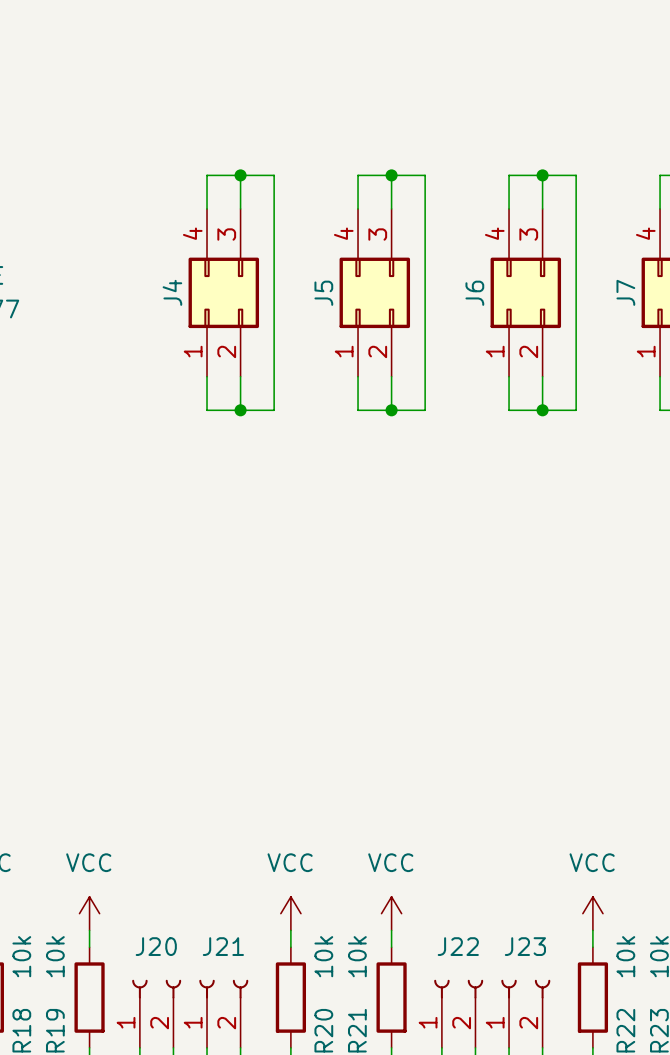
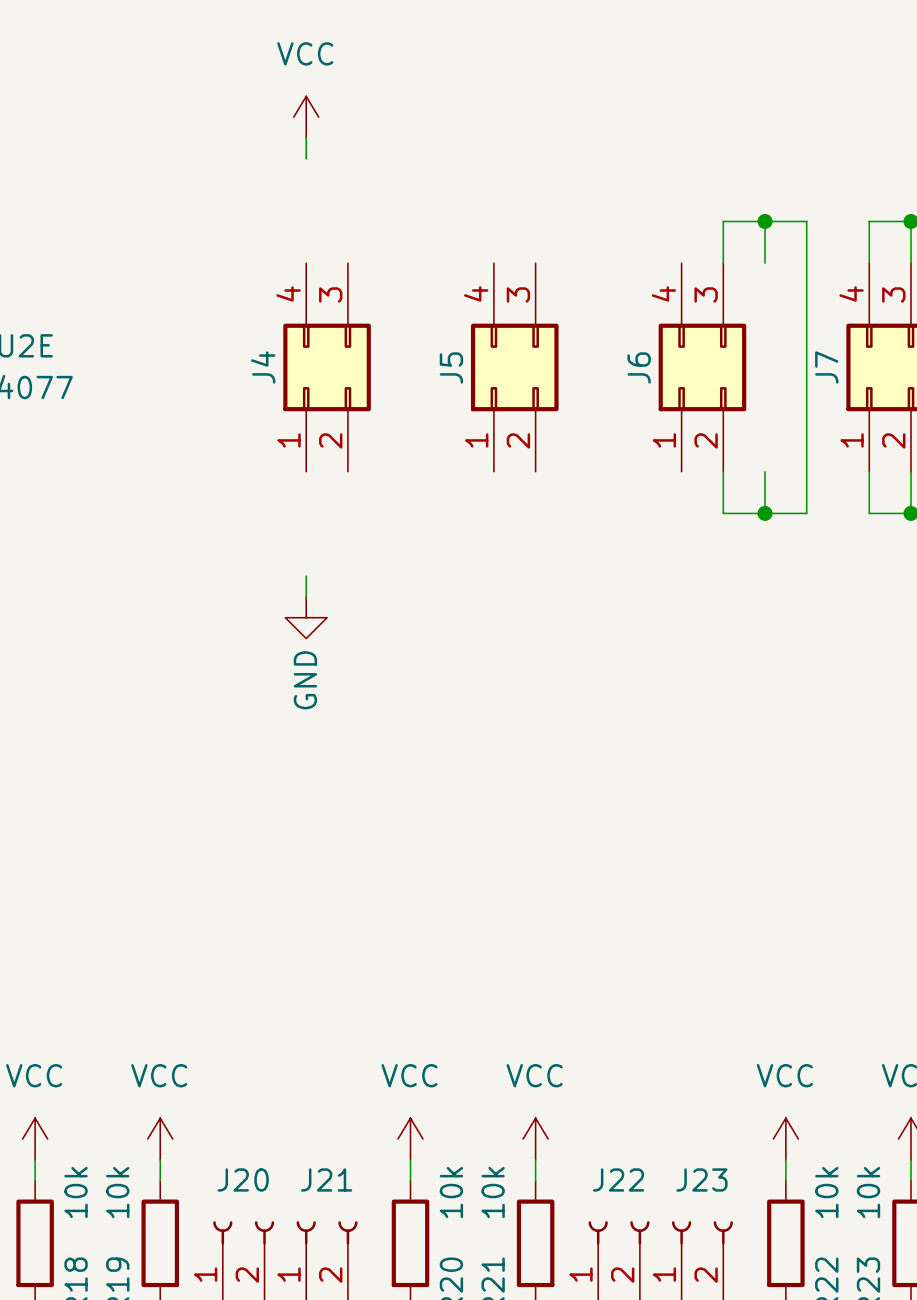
power symbol: none -> VCC (306, 117)
wire: none -> (306, 138) (306, 158)
wire: (240, 175) (240, 208) -> none
junction: (240, 175) -> none
wire: (391, 175) (391, 208) -> none
junction: (391, 175) -> none
wire: (542, 175) (509, 175) (509, 208) -> none
junction position: (542, 175) -> (765, 221)
wire: none -> (765, 221) (806, 221) (806, 513) (765, 513)
wire: (207, 208) (207, 175) (274, 175) (274, 410) (207, 410) (207, 376) -> none
wire: (358, 208) (358, 175) (425, 175) (425, 410) (358, 410) (358, 376) -> none
wire: (576, 208) (576, 376) -> none
wire: (240, 376) (240, 410) -> none
wire: (391, 376) (391, 410) -> none
wire: (509, 376) (509, 410) (542, 410) -> none
junction: (240, 410) -> none
junction: (391, 410) -> none
junction position: (542, 410) -> (765, 513)
wire: none -> (306, 576) (306, 596)
power symbol: none -> GND (306, 617)

